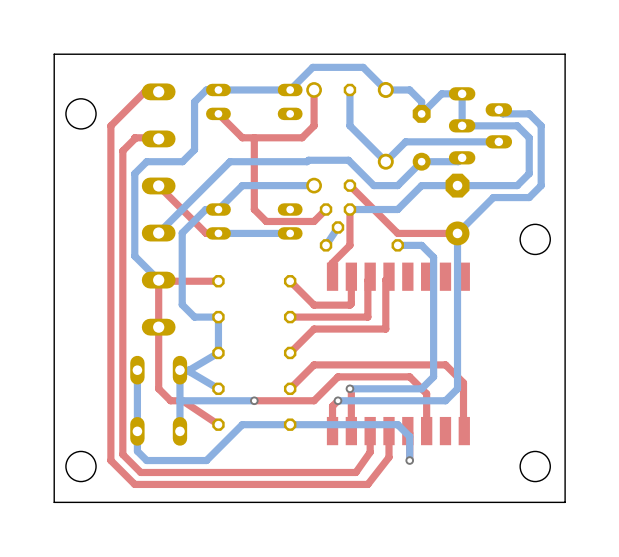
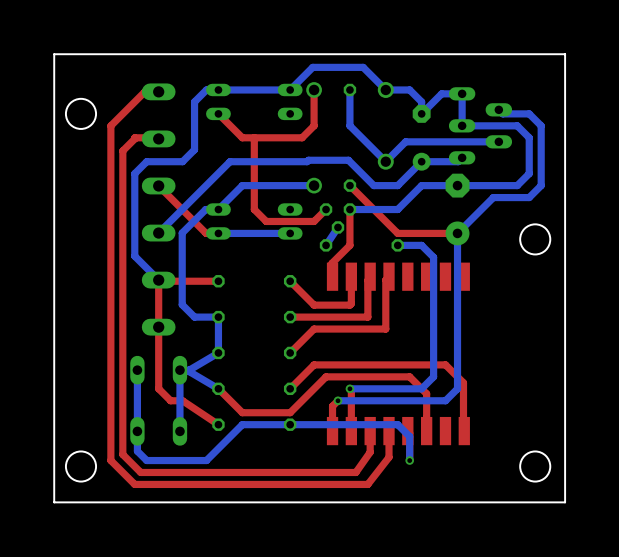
top track: (337, 376) (314, 400) (254, 400) -> (337, 376) (326, 376) (290, 412) (242, 412) (218, 388)
bottom track: (254, 400) (179, 400) -> none
via: (254, 400) -> none

